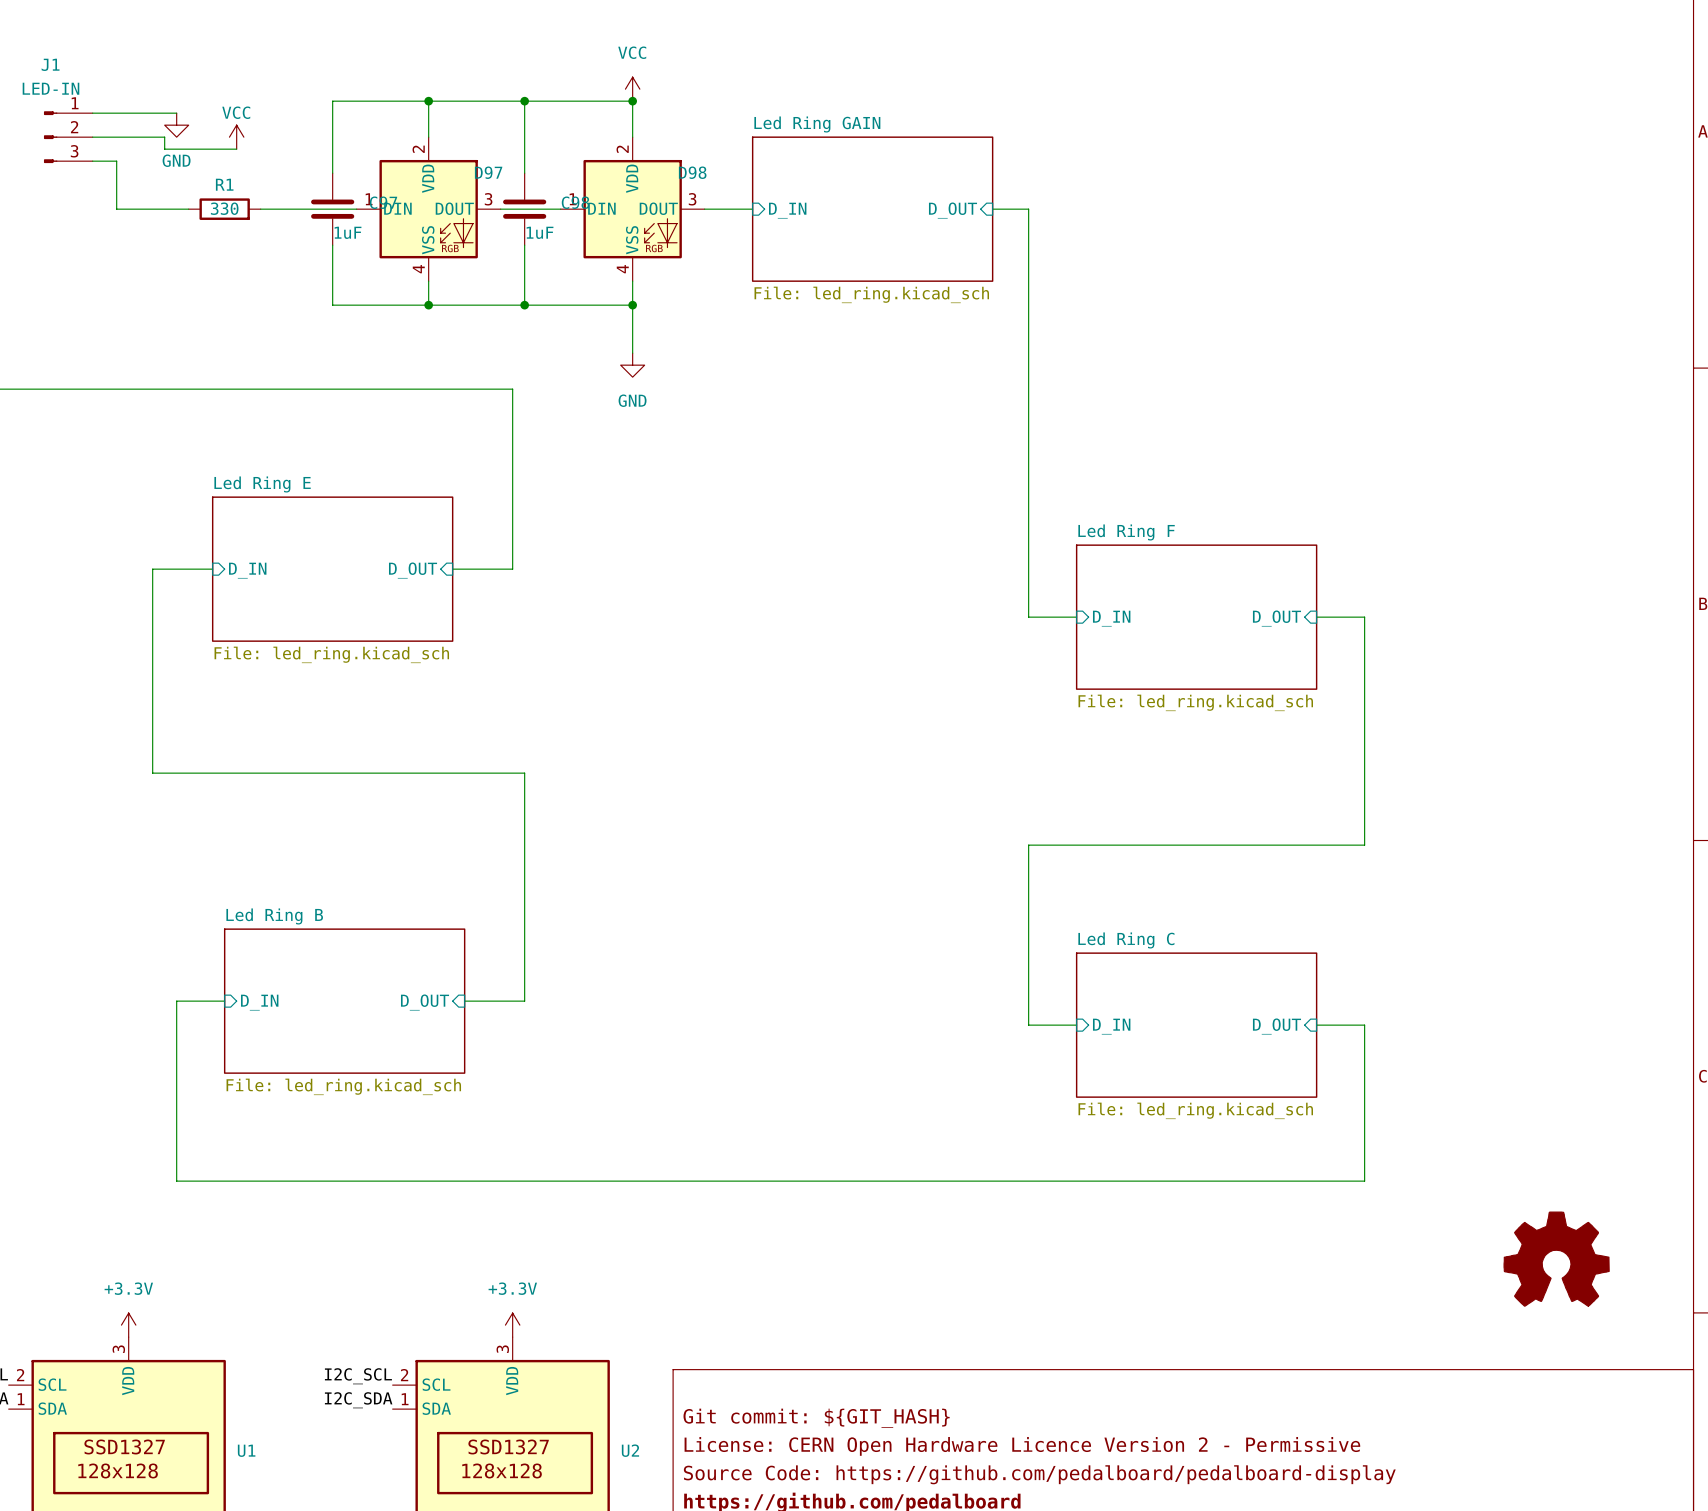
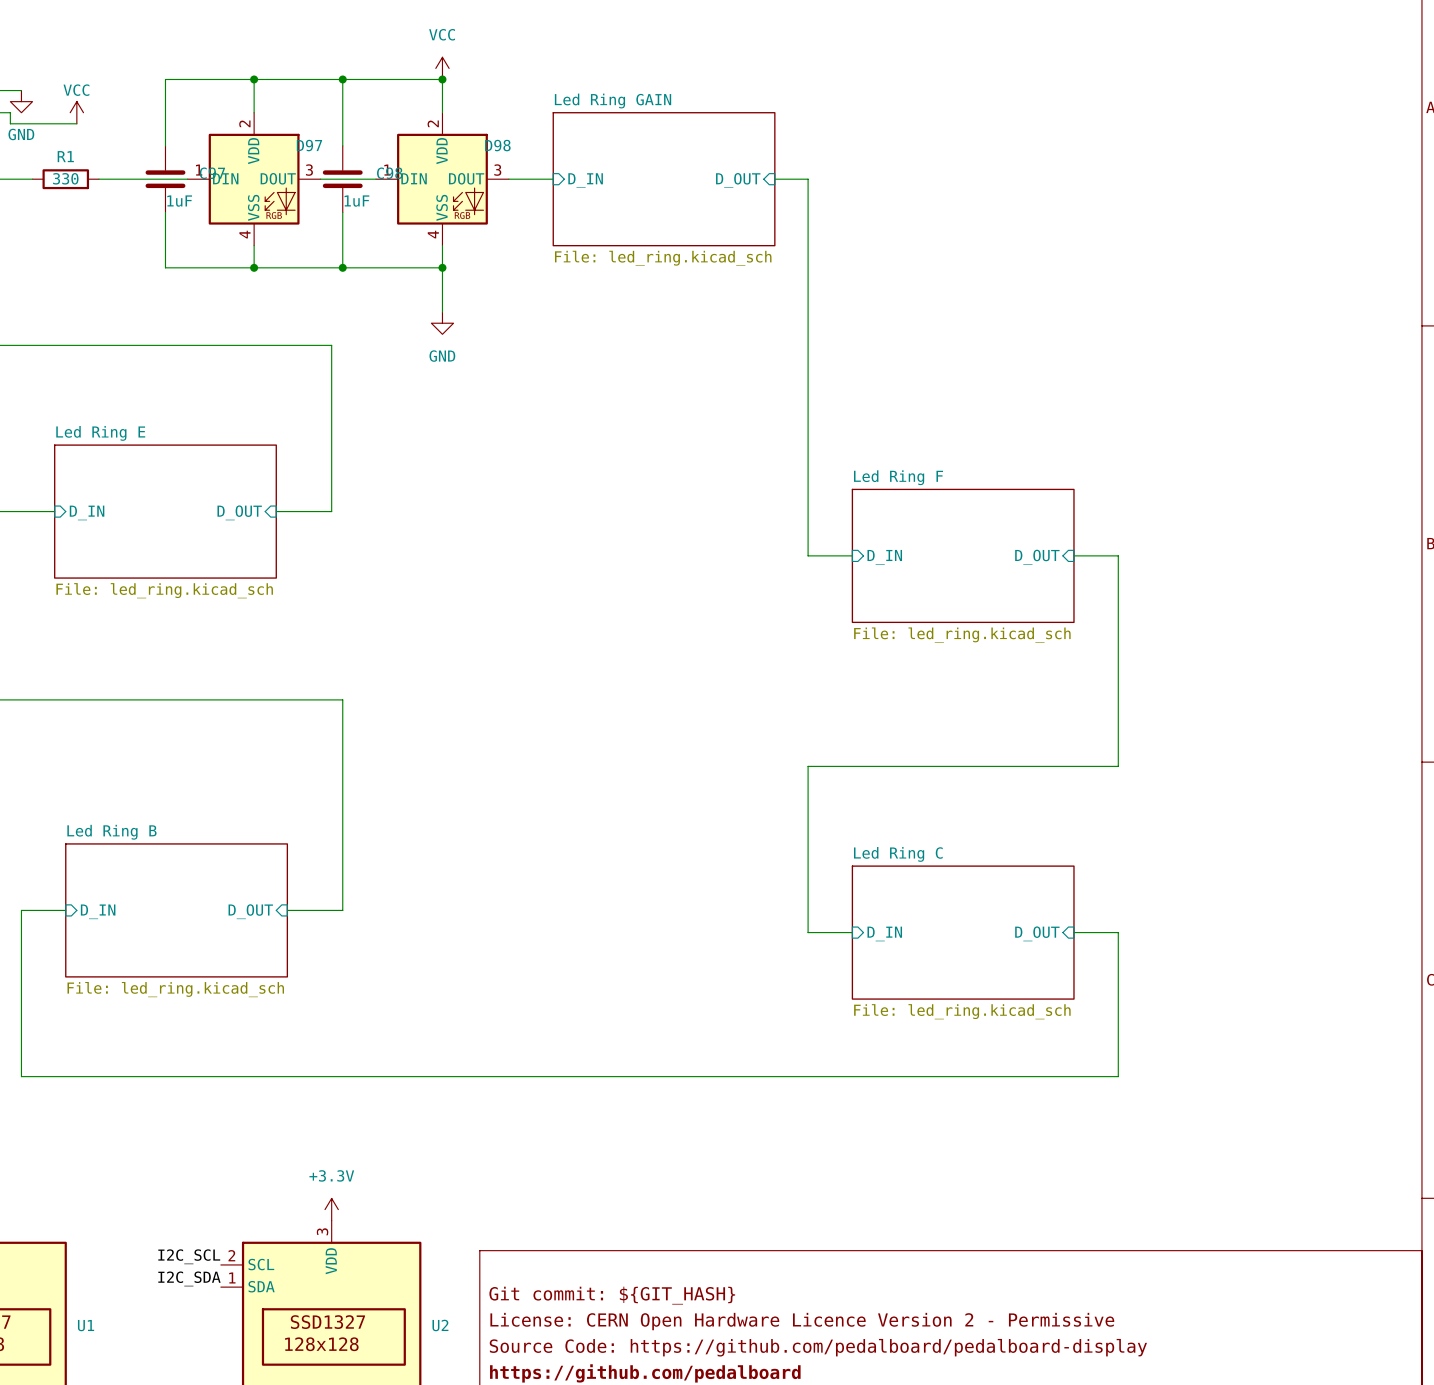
power symbol: (1556, 1259) -> none

